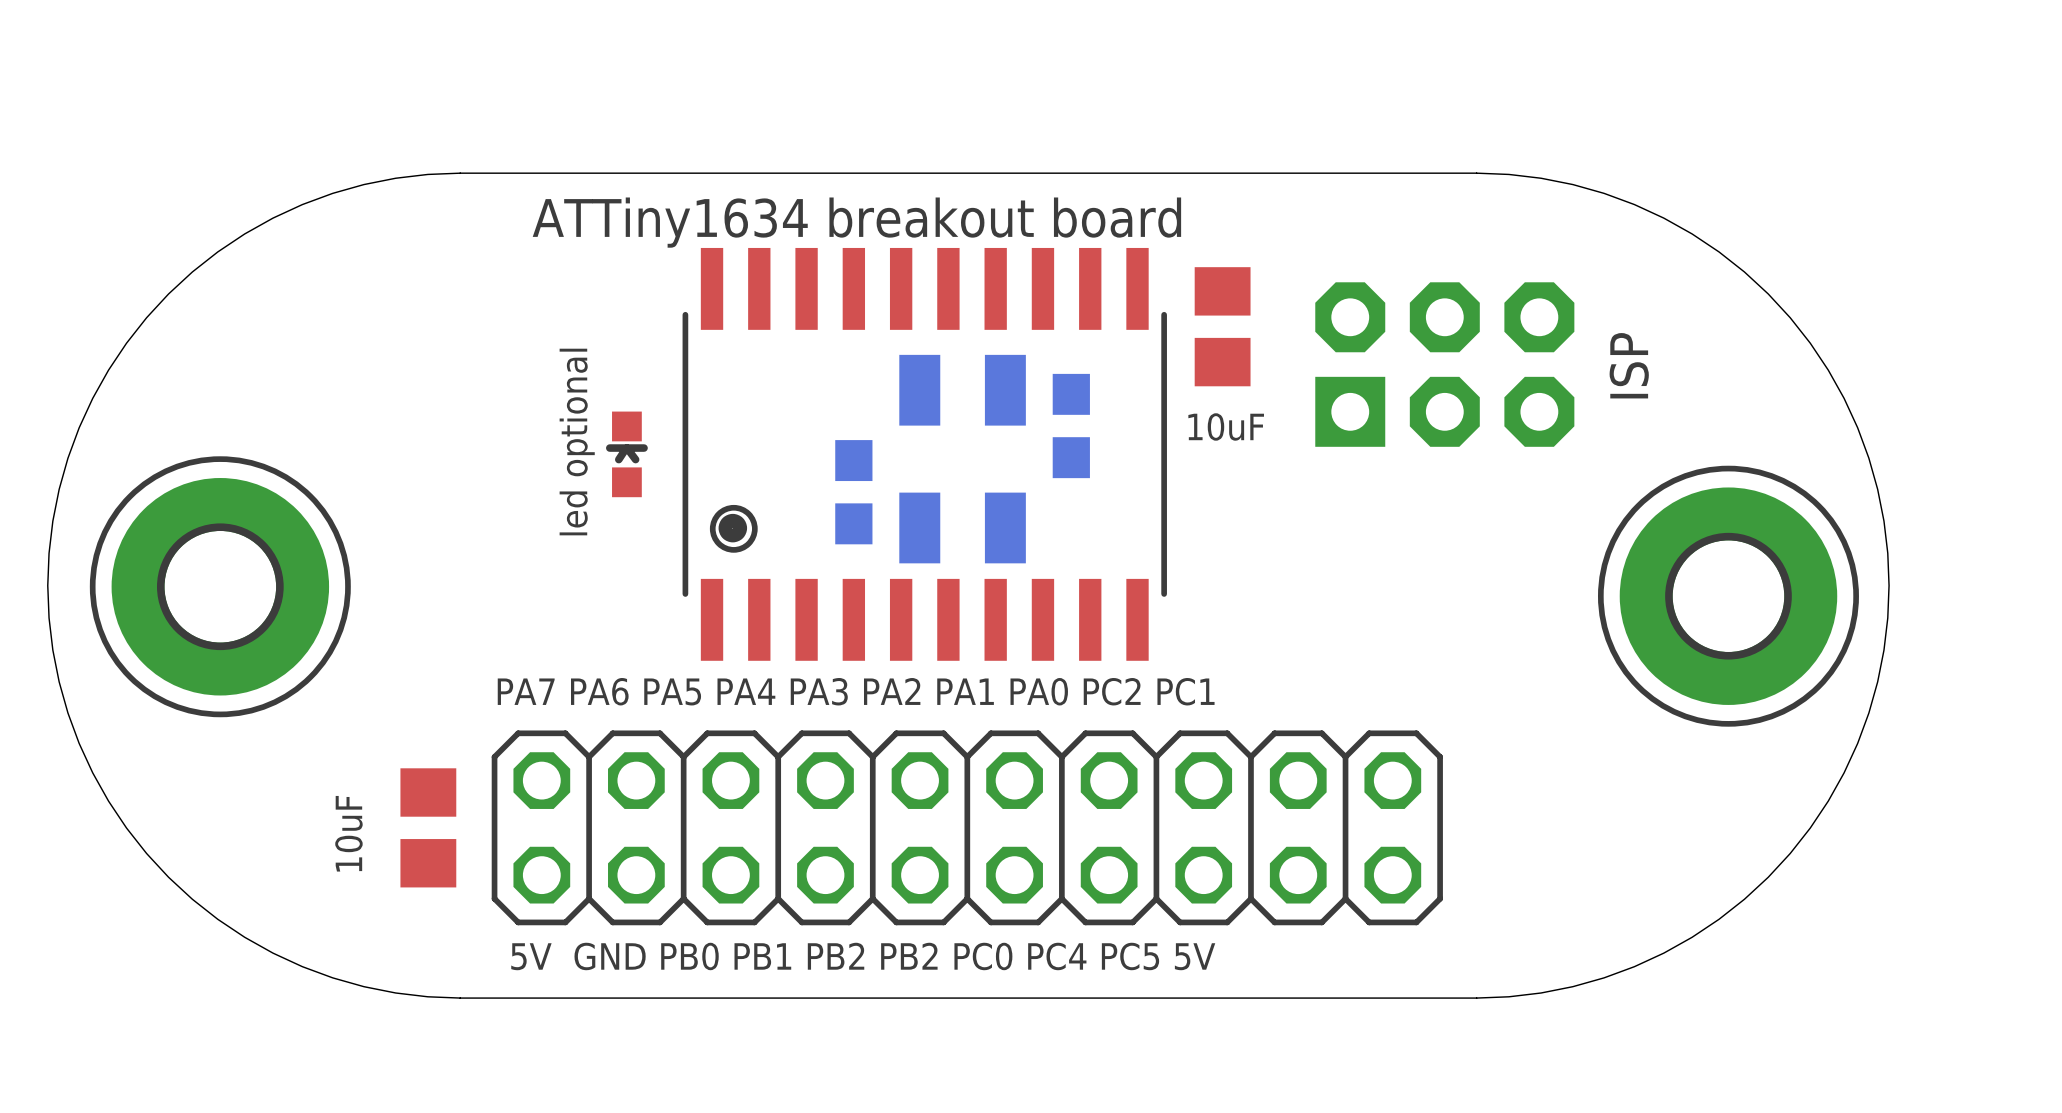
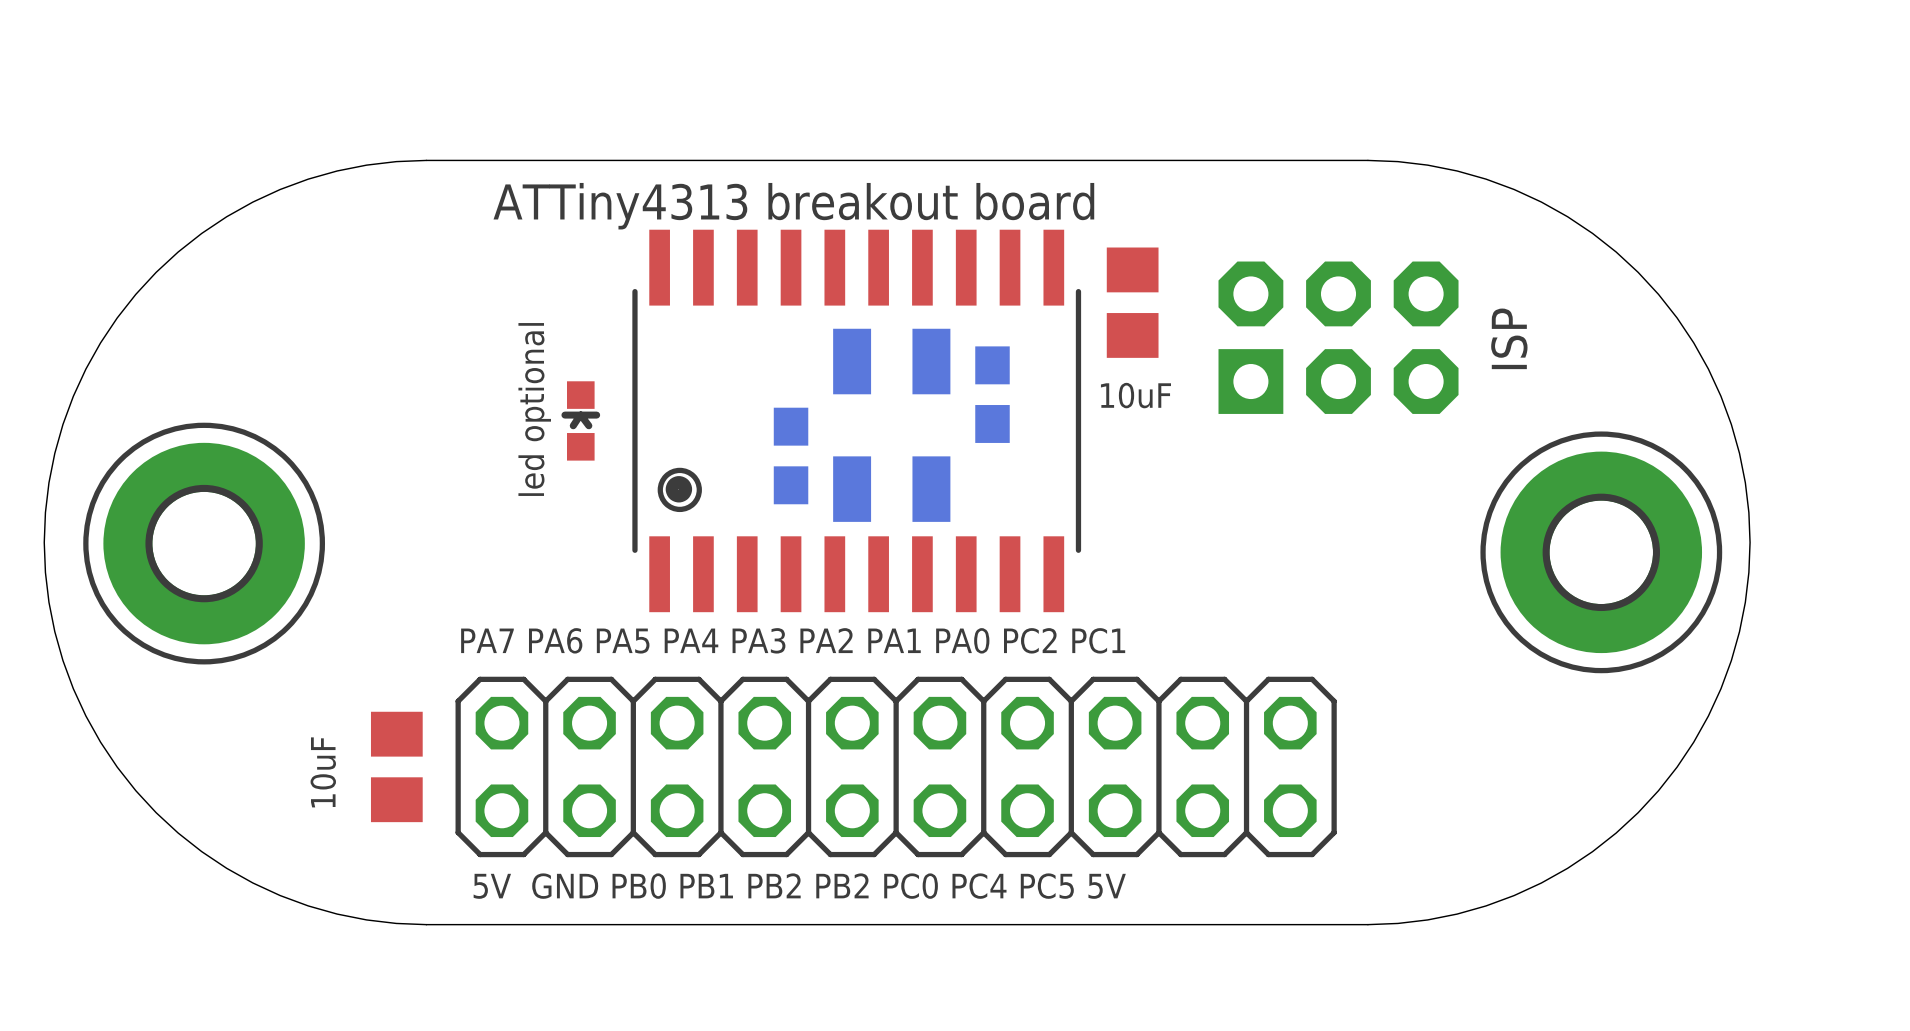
text: ATTiny1634 breakout board (856, 222) -> ATTiny4313 breakout board (793, 206)

